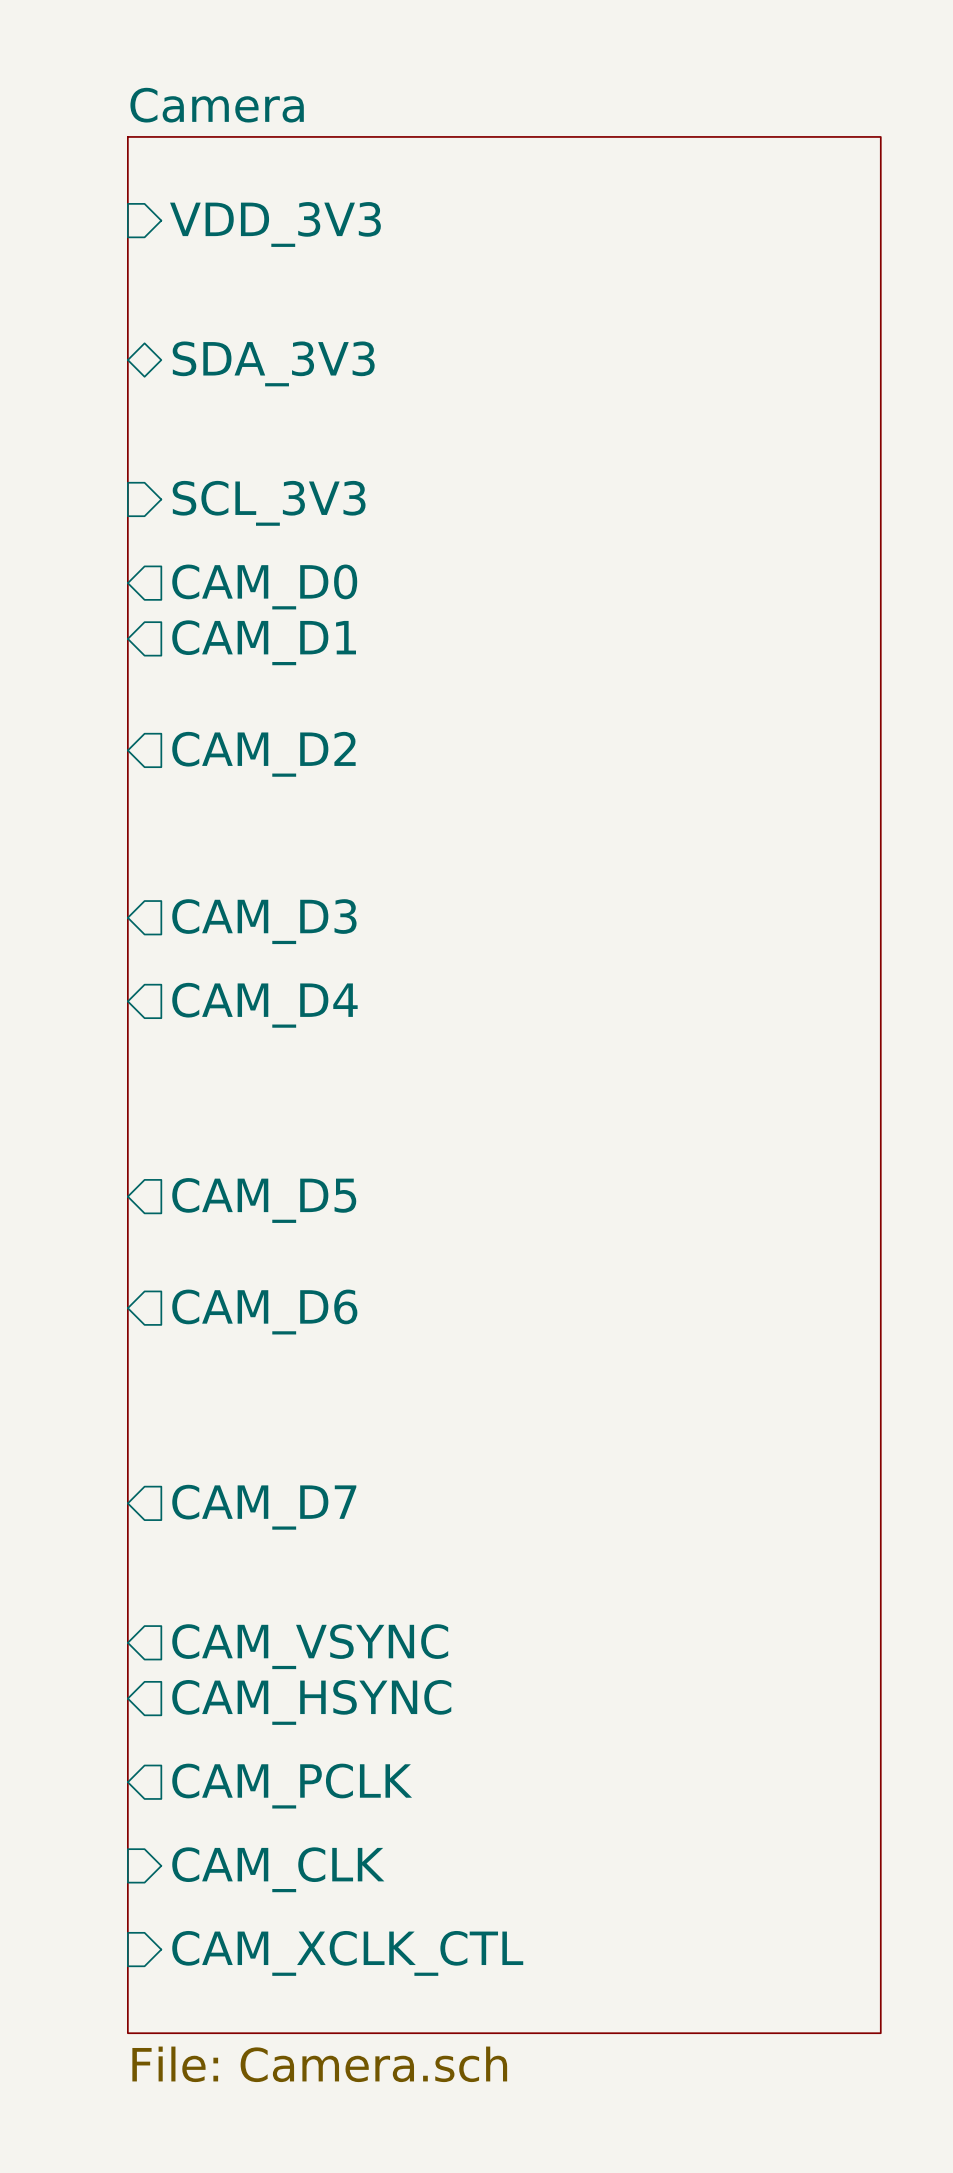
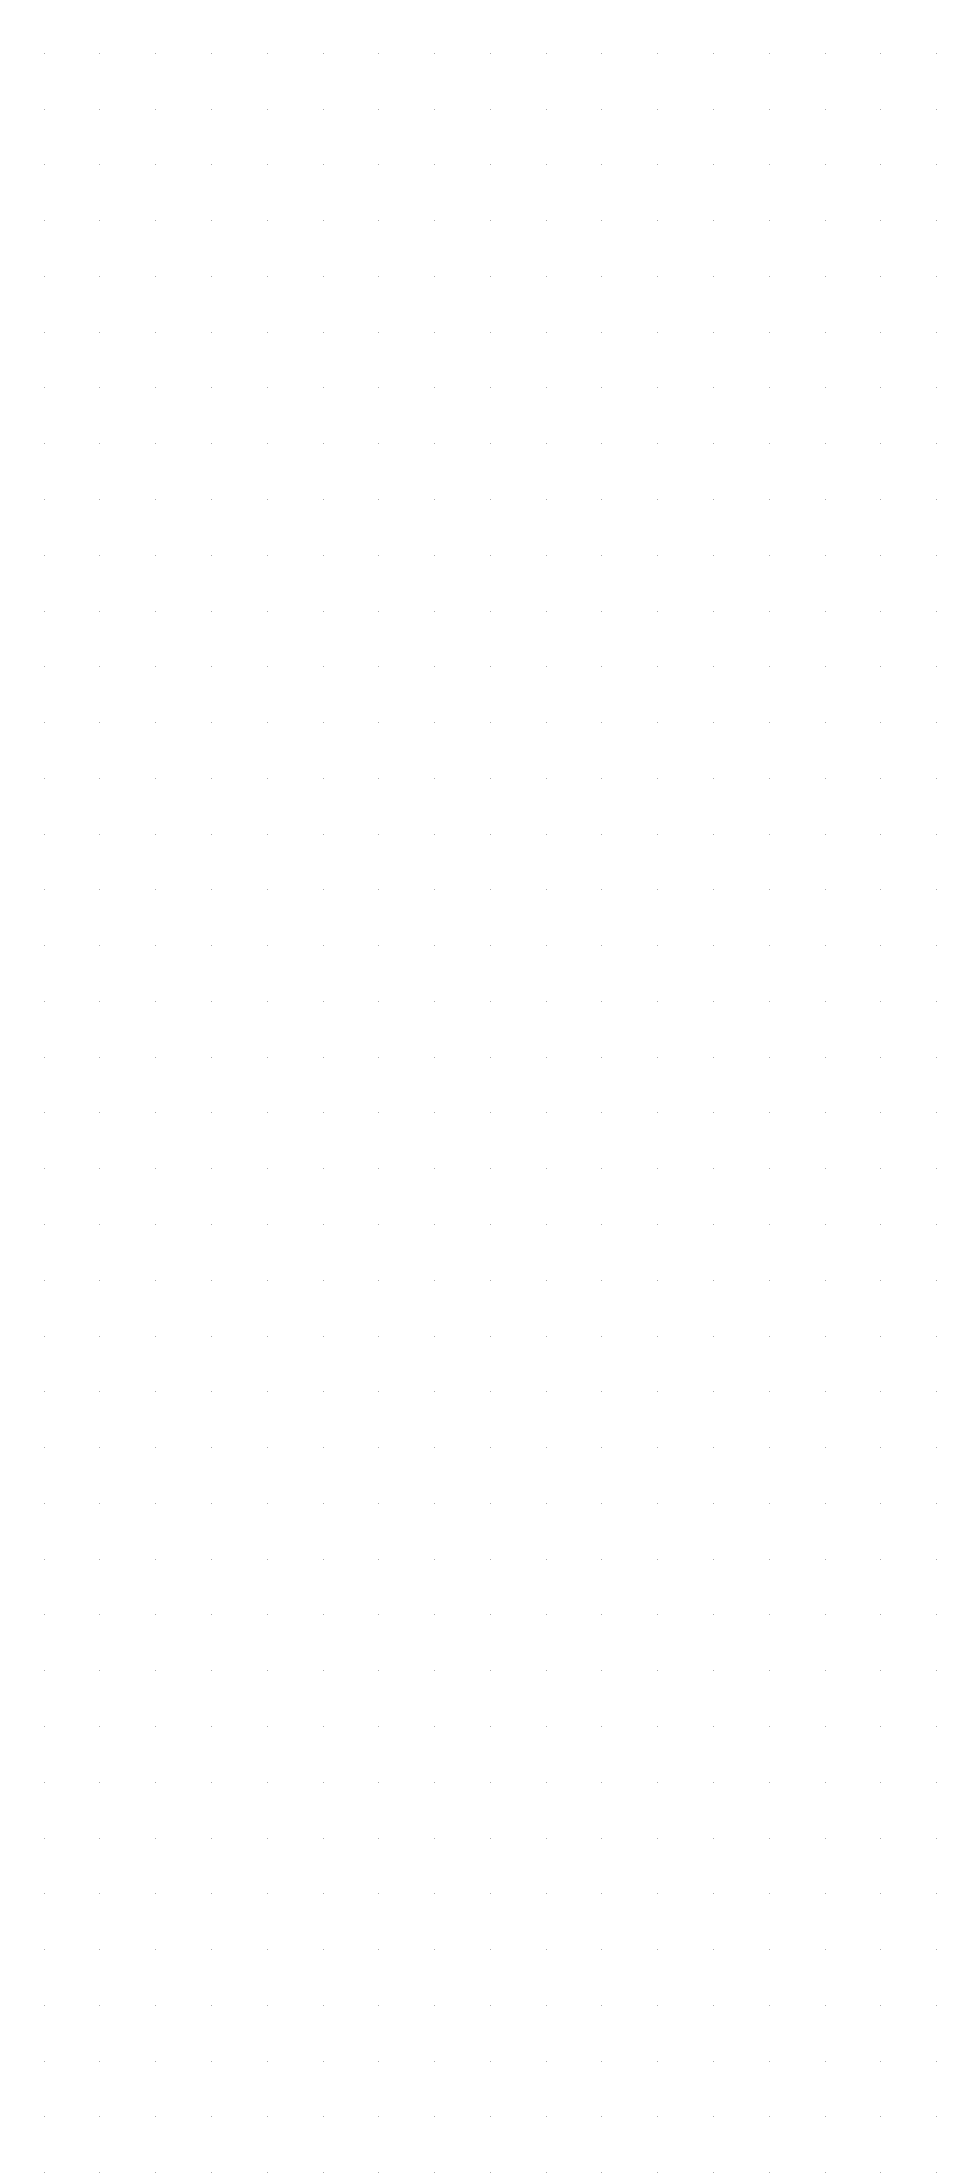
sheet pin: VDD_3V3 (275, 224) -> none
sheet pin: SDA_3V3 (273, 363) -> none
sheet pin: SCL_3V3 (269, 503) -> none
sheet pin: CAM_D0 (264, 586) -> none
sheet pin: CAM_D1 (264, 642) -> none
sheet pin: CAM_D2 (263, 754) -> none
sheet pin: CAM_D3 (264, 921) -> none
sheet pin: CAM_D4 (264, 1005) -> none
sheet Camera: File: Camera.sch (504, 1085) -> none
sheet pin: CAM_D5 (264, 1200) -> none
sheet pin: CAM_D6 (264, 1312) -> none
sheet pin: CAM_D7 (264, 1507) -> none
sheet pin: CAM_VSYNC (310, 1646) -> none
sheet pin: CAM_HSYNC (311, 1702) -> none
sheet pin: CAM_PCLK (292, 1786) -> none
sheet pin: CAM_CLK (278, 1869) -> none
sheet pin: CAM_XCLK_CTL (347, 1953) -> none

